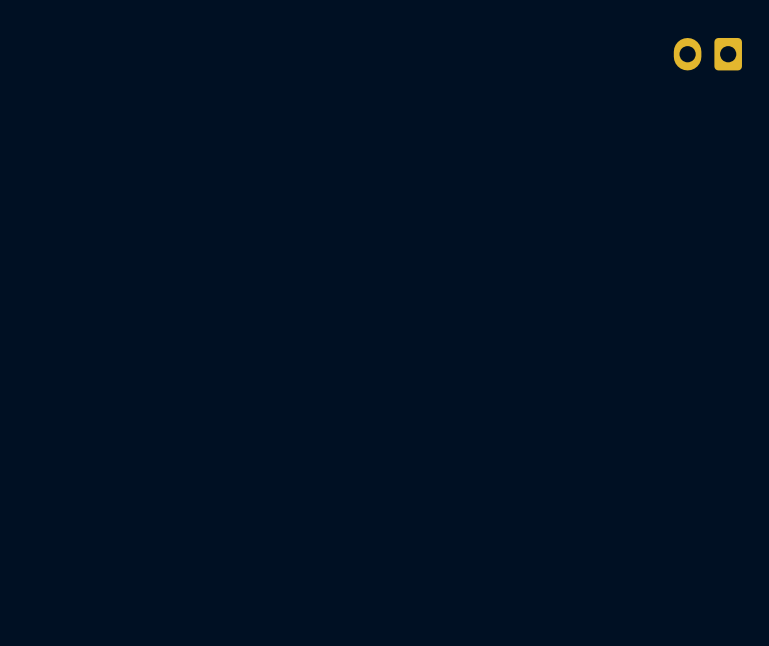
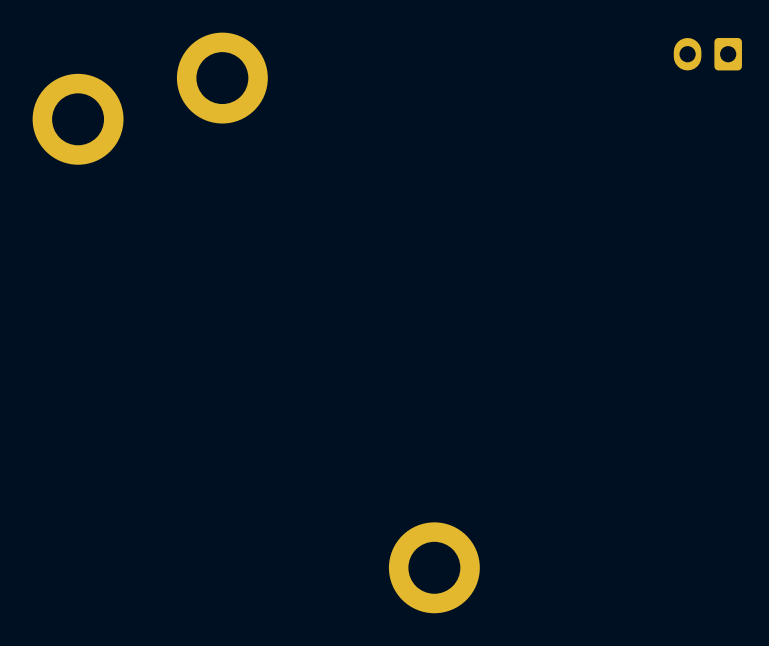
part: none -> (222, 78)
part: none -> (78, 119)
part: none -> (434, 567)

